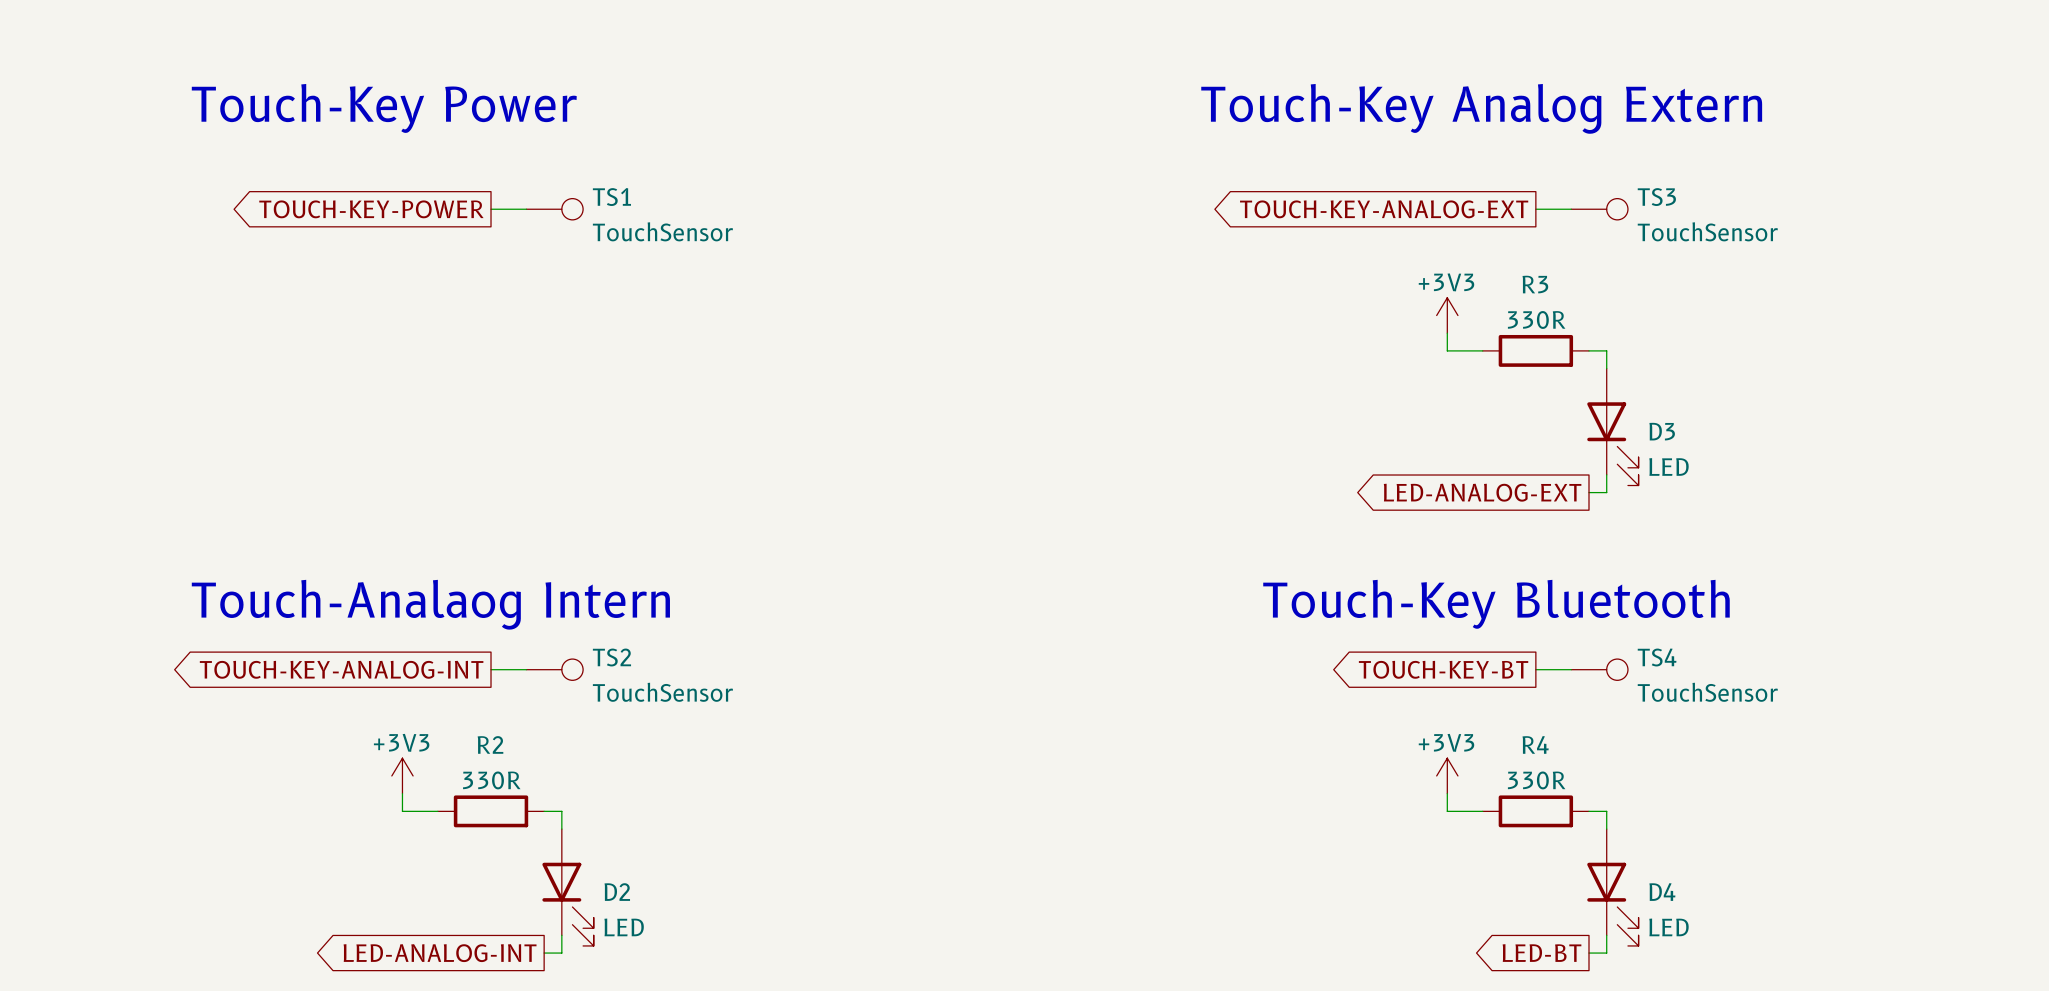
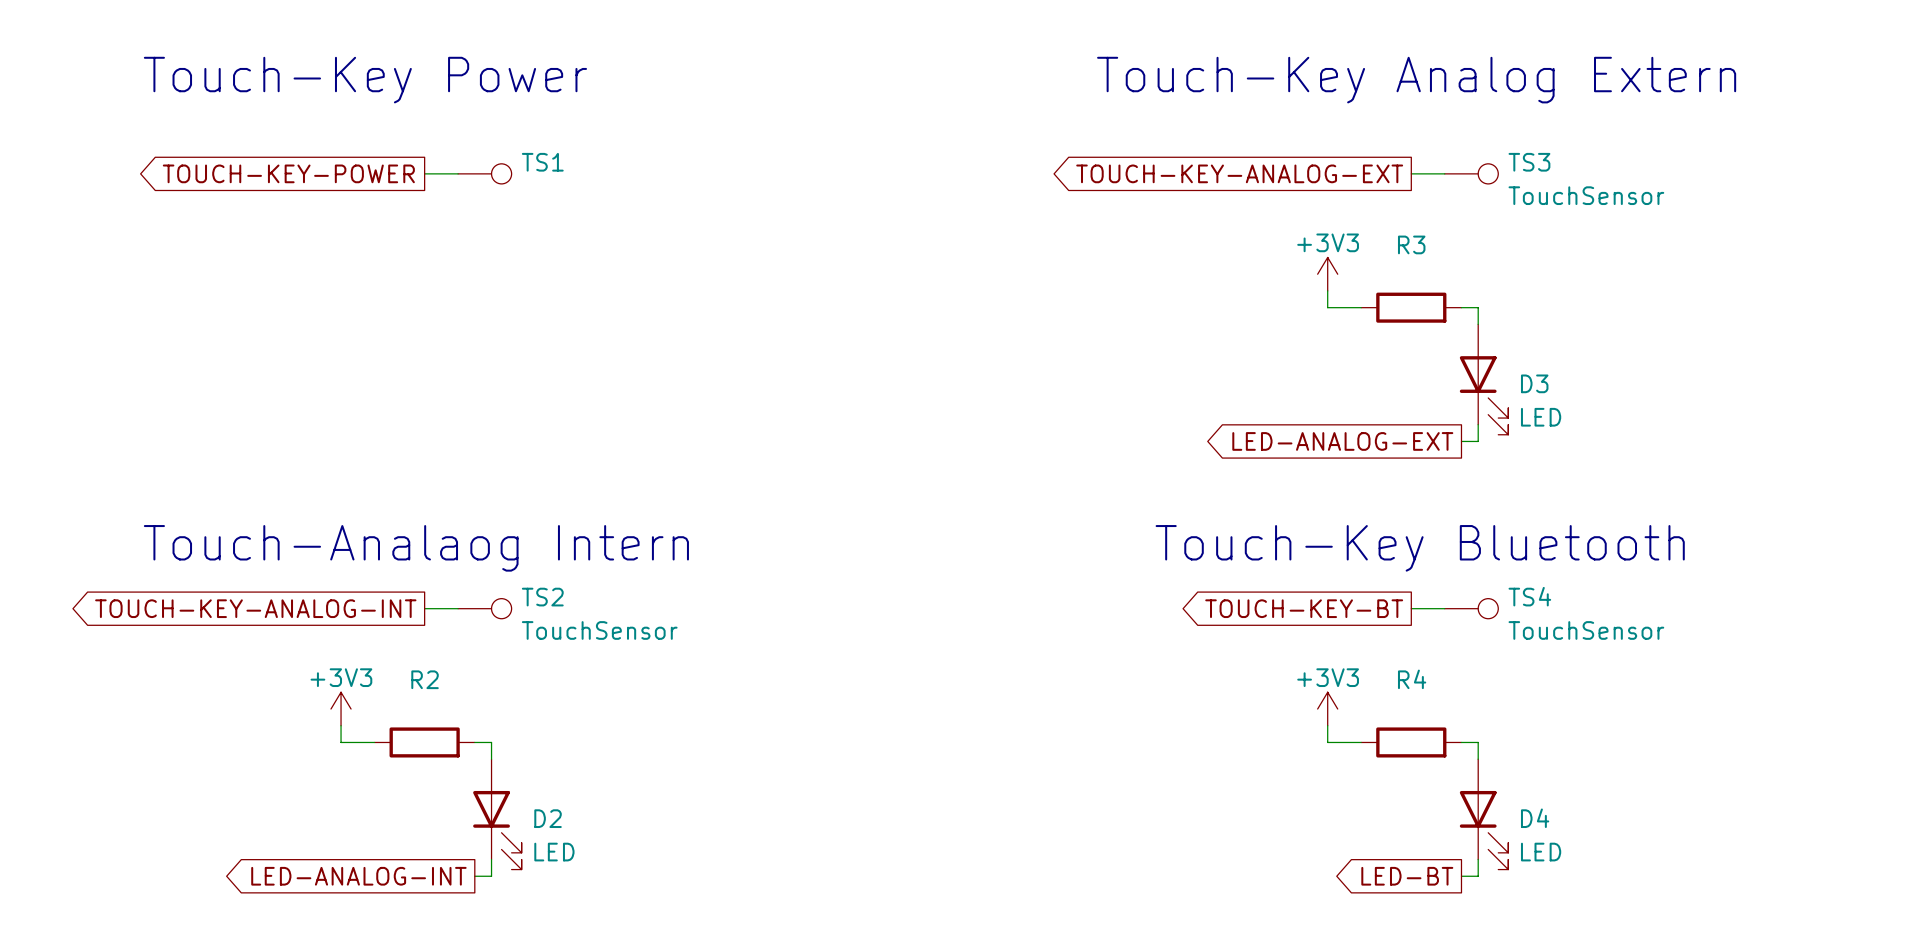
TS1 value: TouchSensor (662, 231) -> none
R3 value: 330R (1536, 319) -> none
R2 value: 330R (491, 780) -> none
R4 value: 330R (1536, 780) -> none

